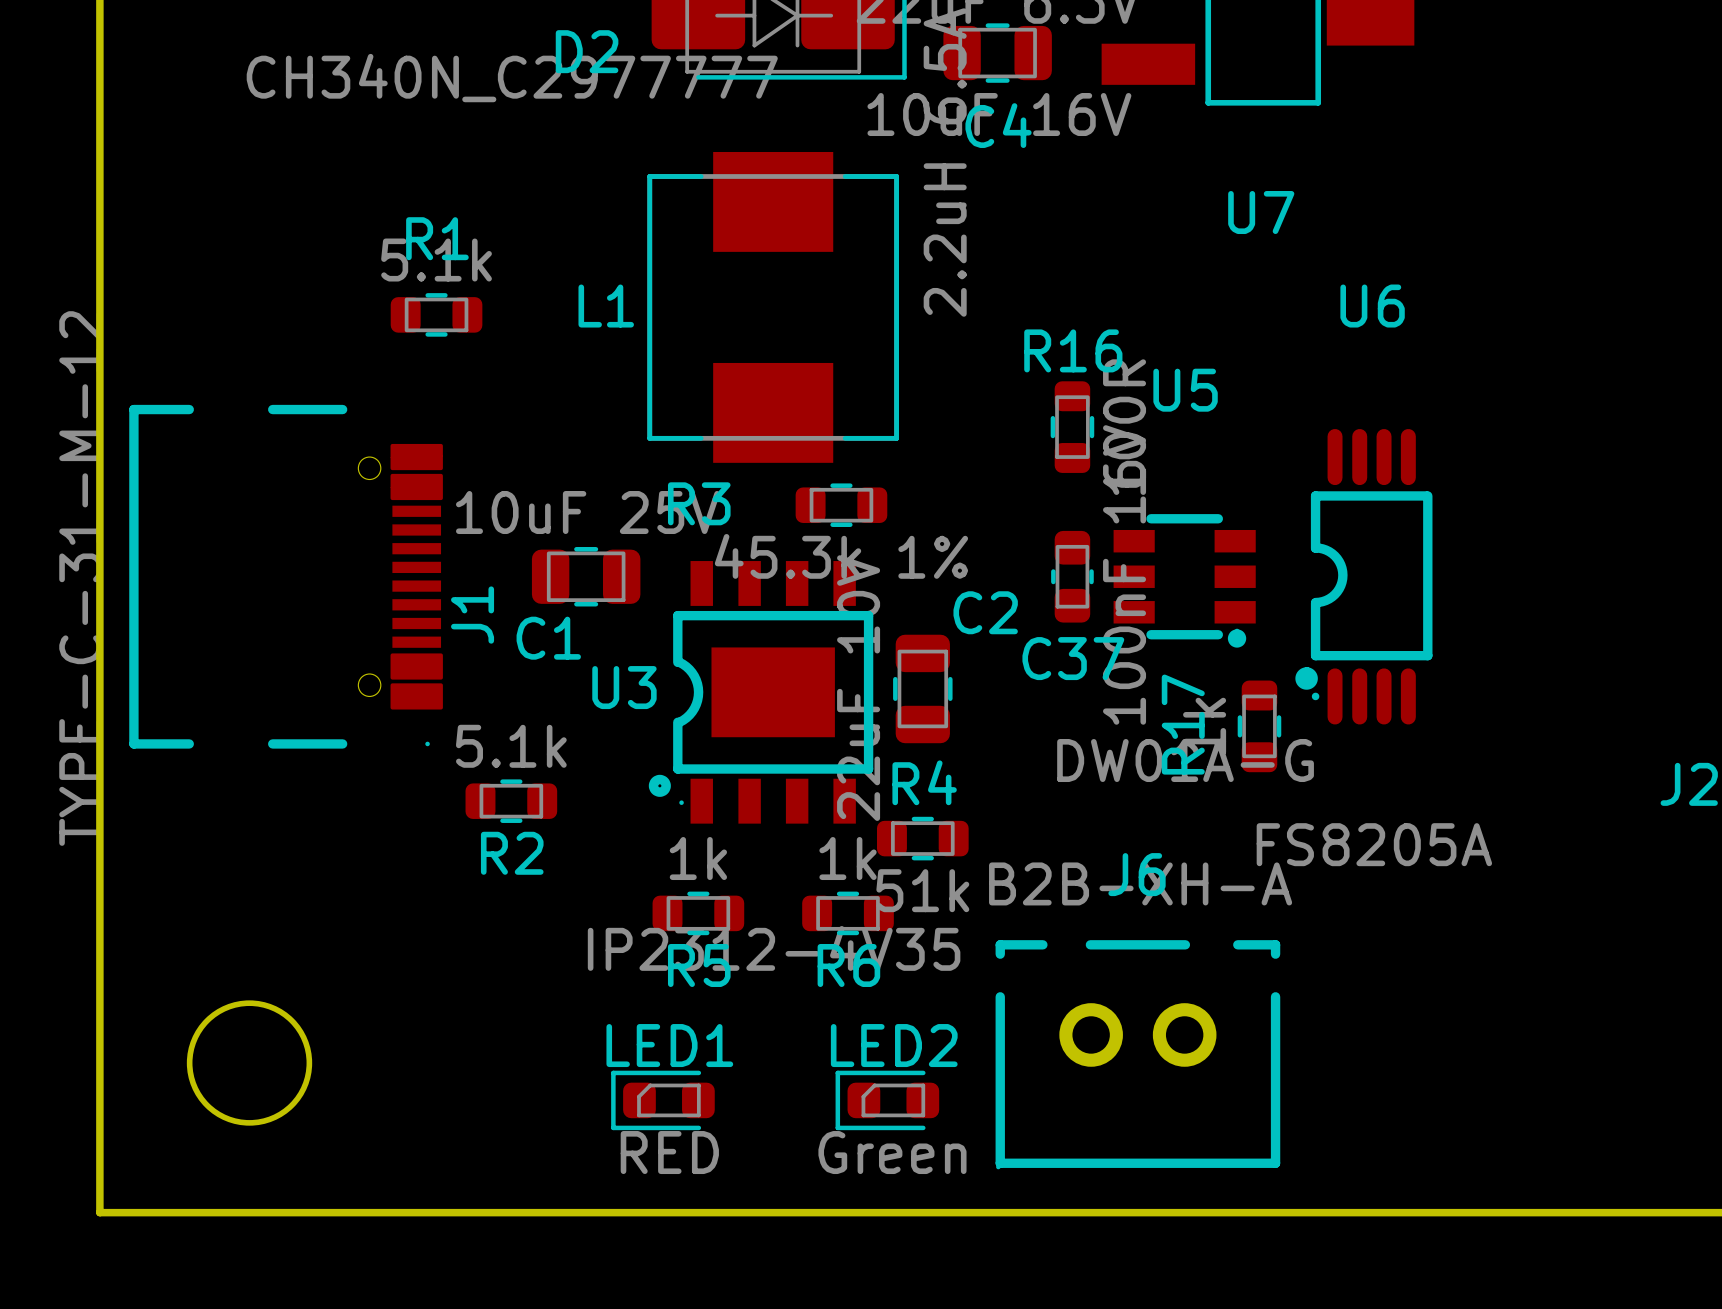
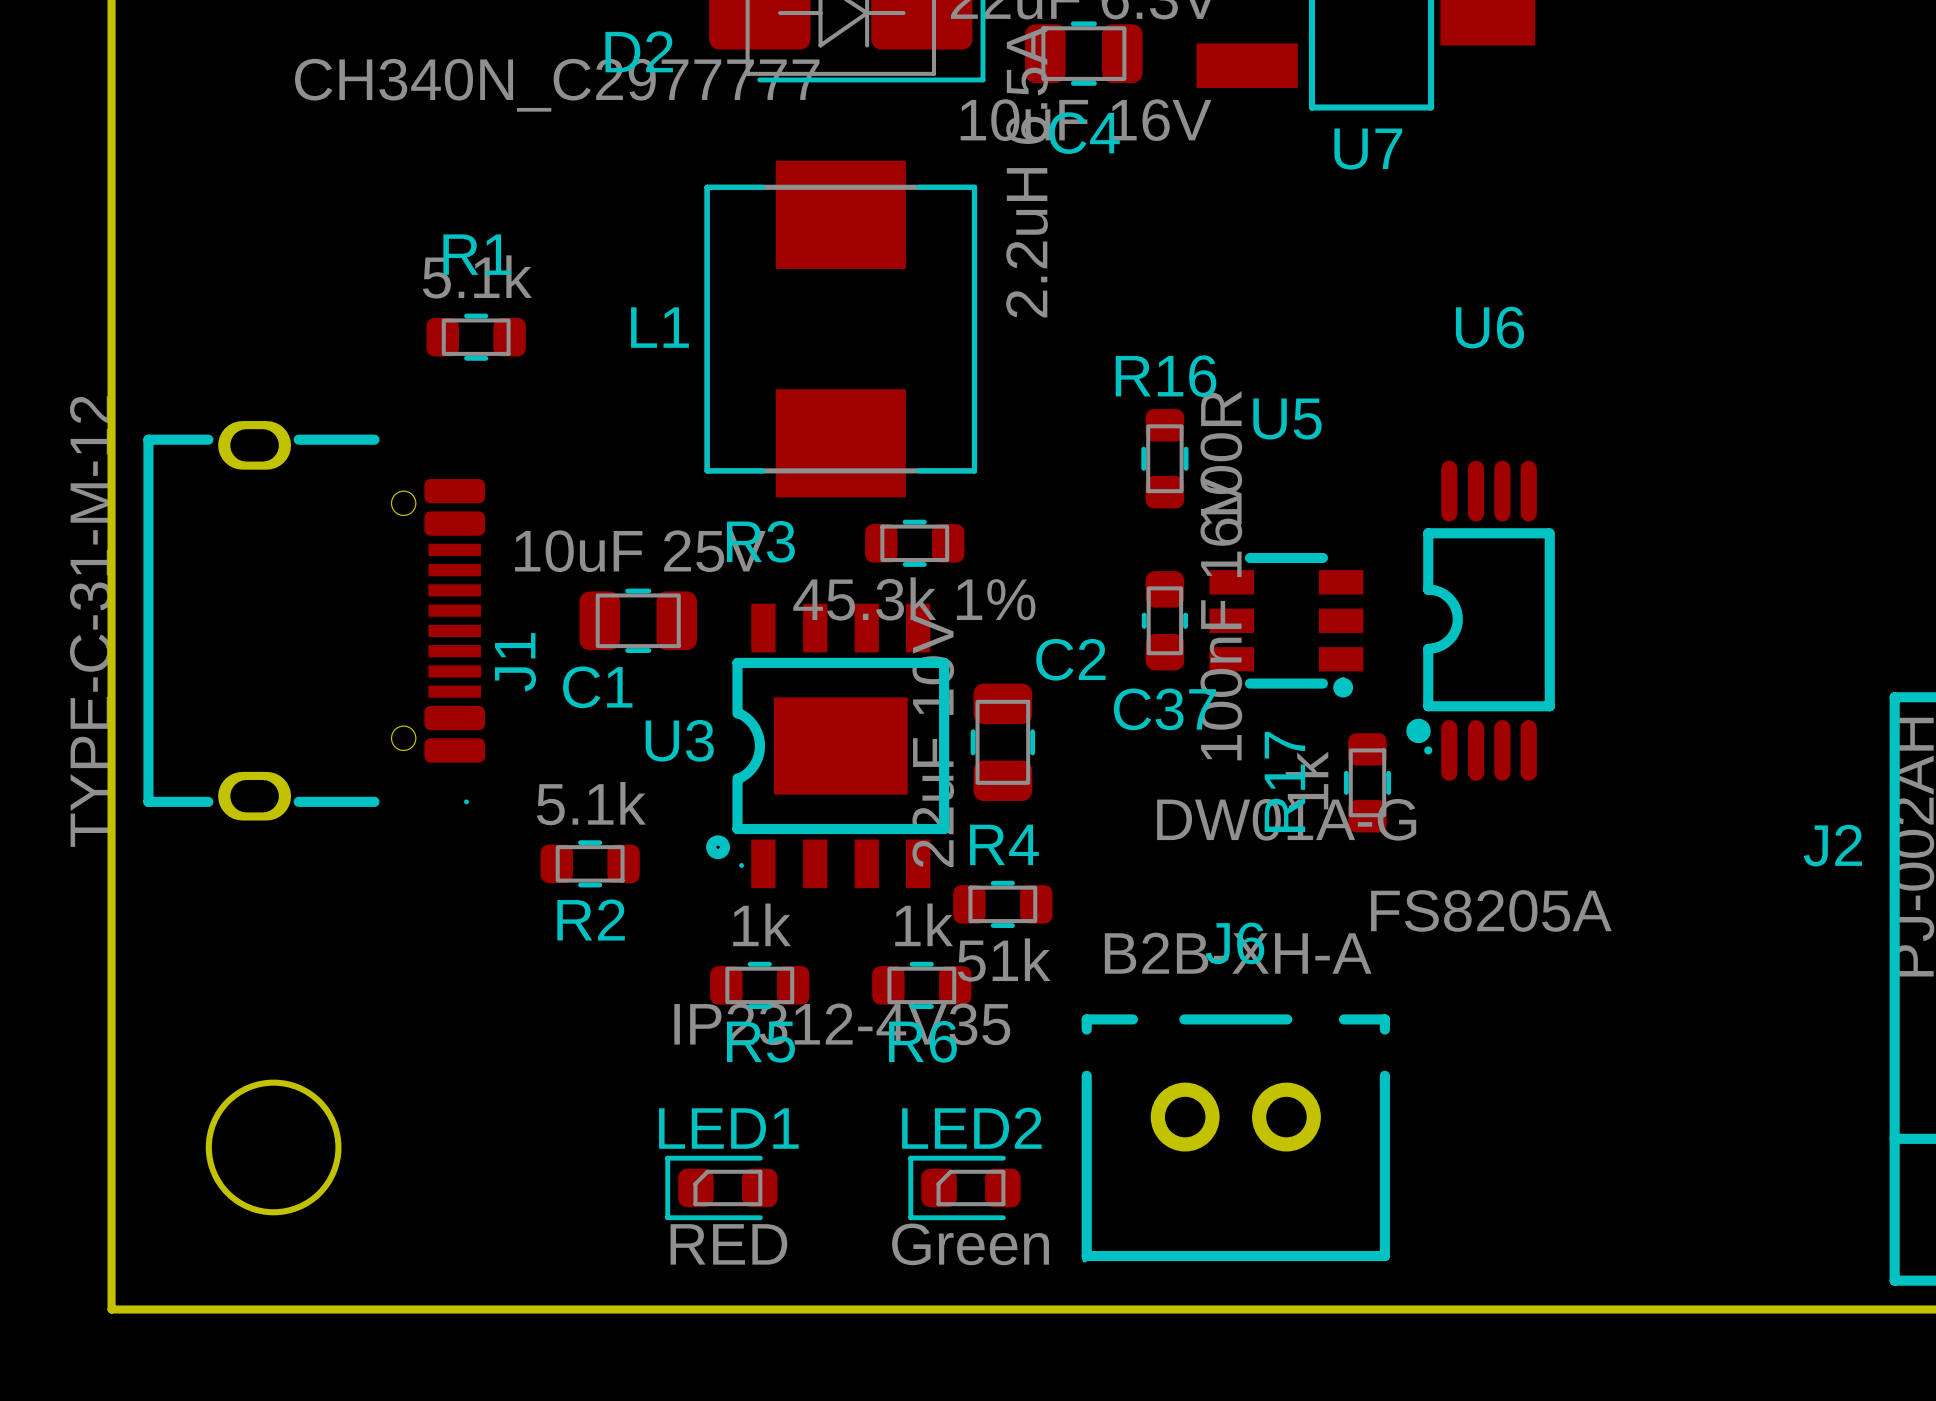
U7 name position: U7 (1261, 212) -> U7 (1368, 149)
J1 footprint: [129, 399, 443, 754] -> [143, 421, 486, 821]
R2 position: (511, 801) -> (590, 863)

